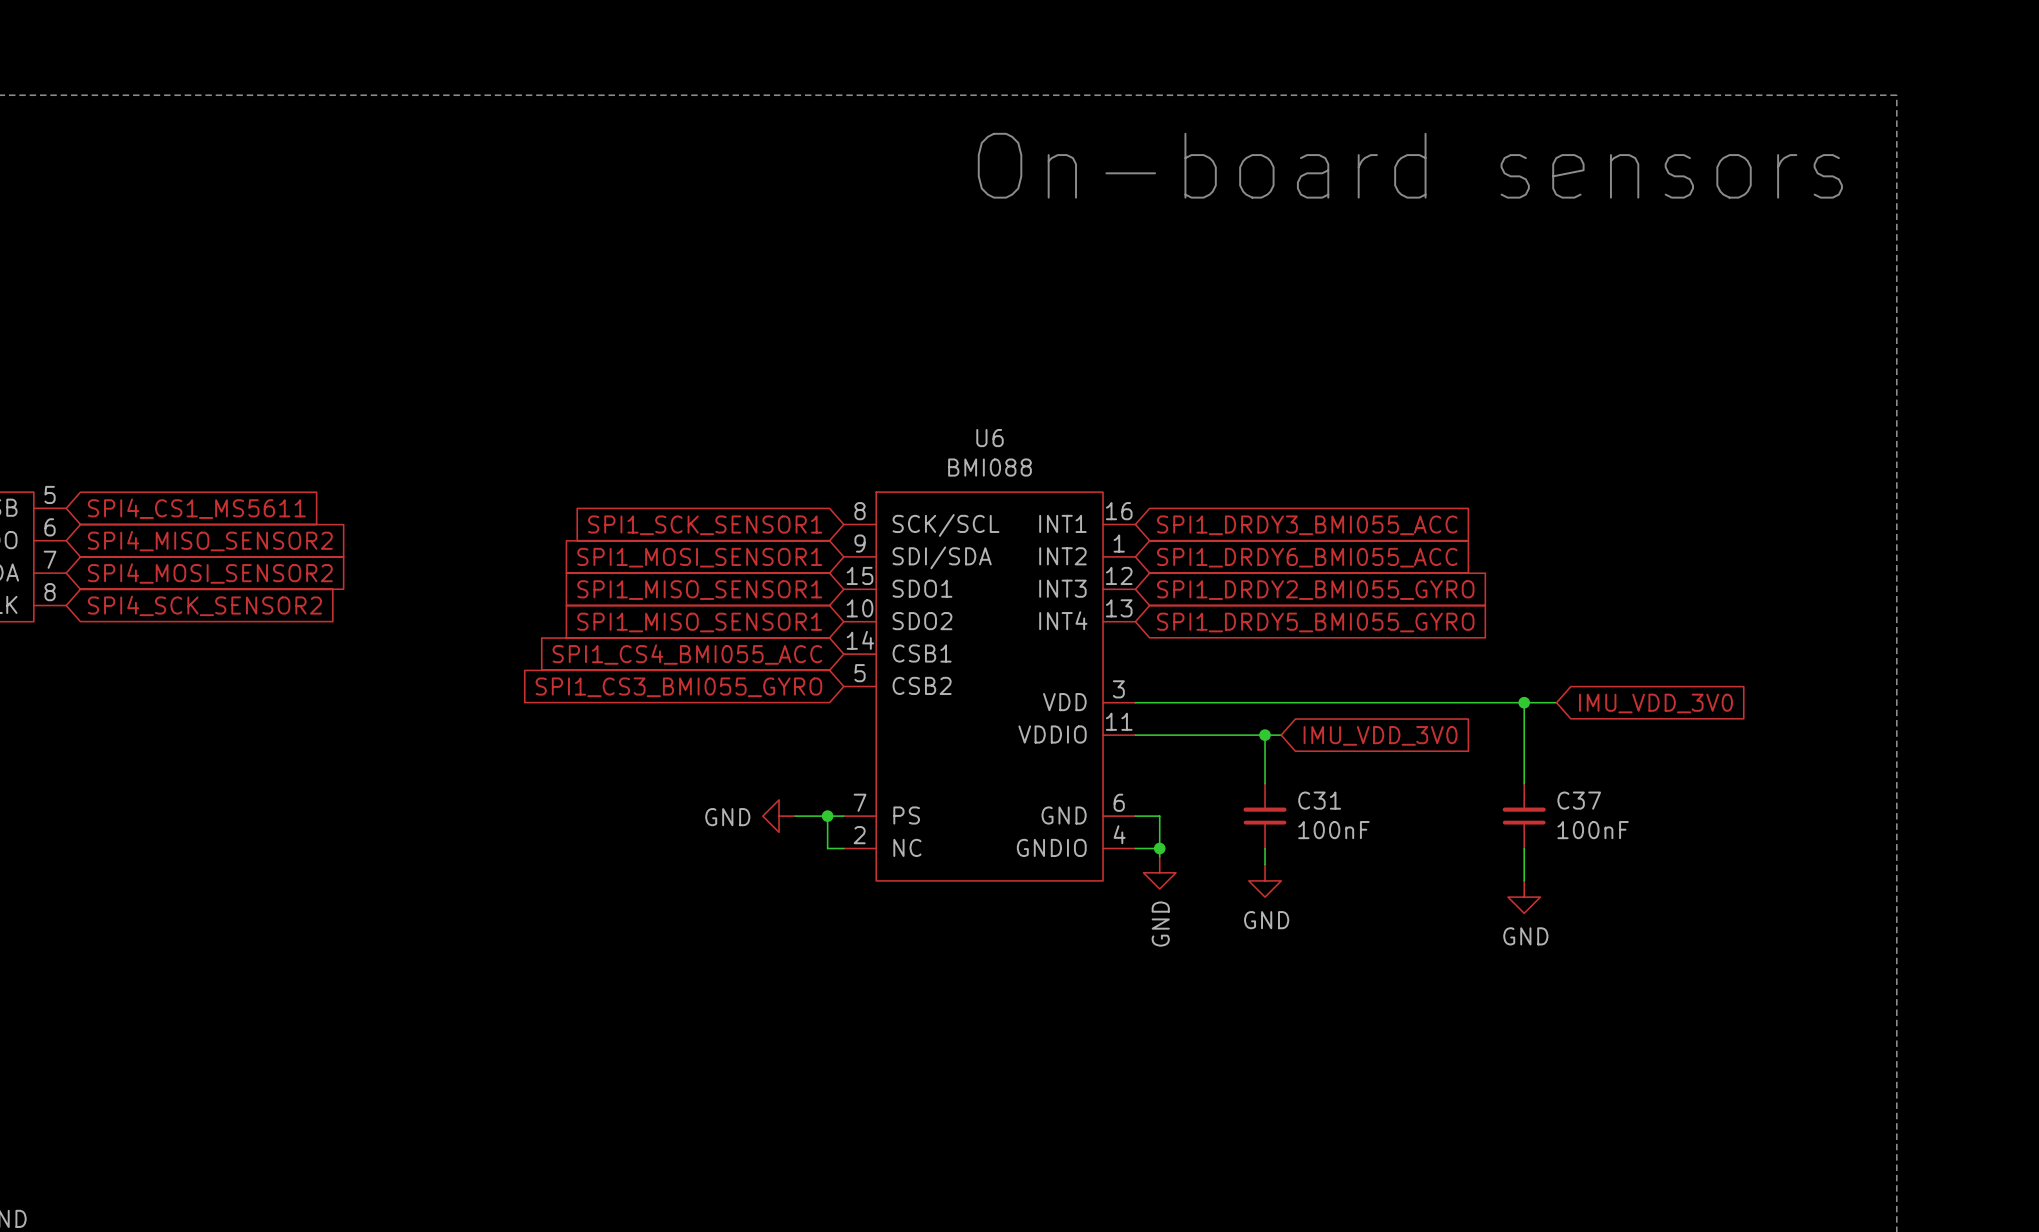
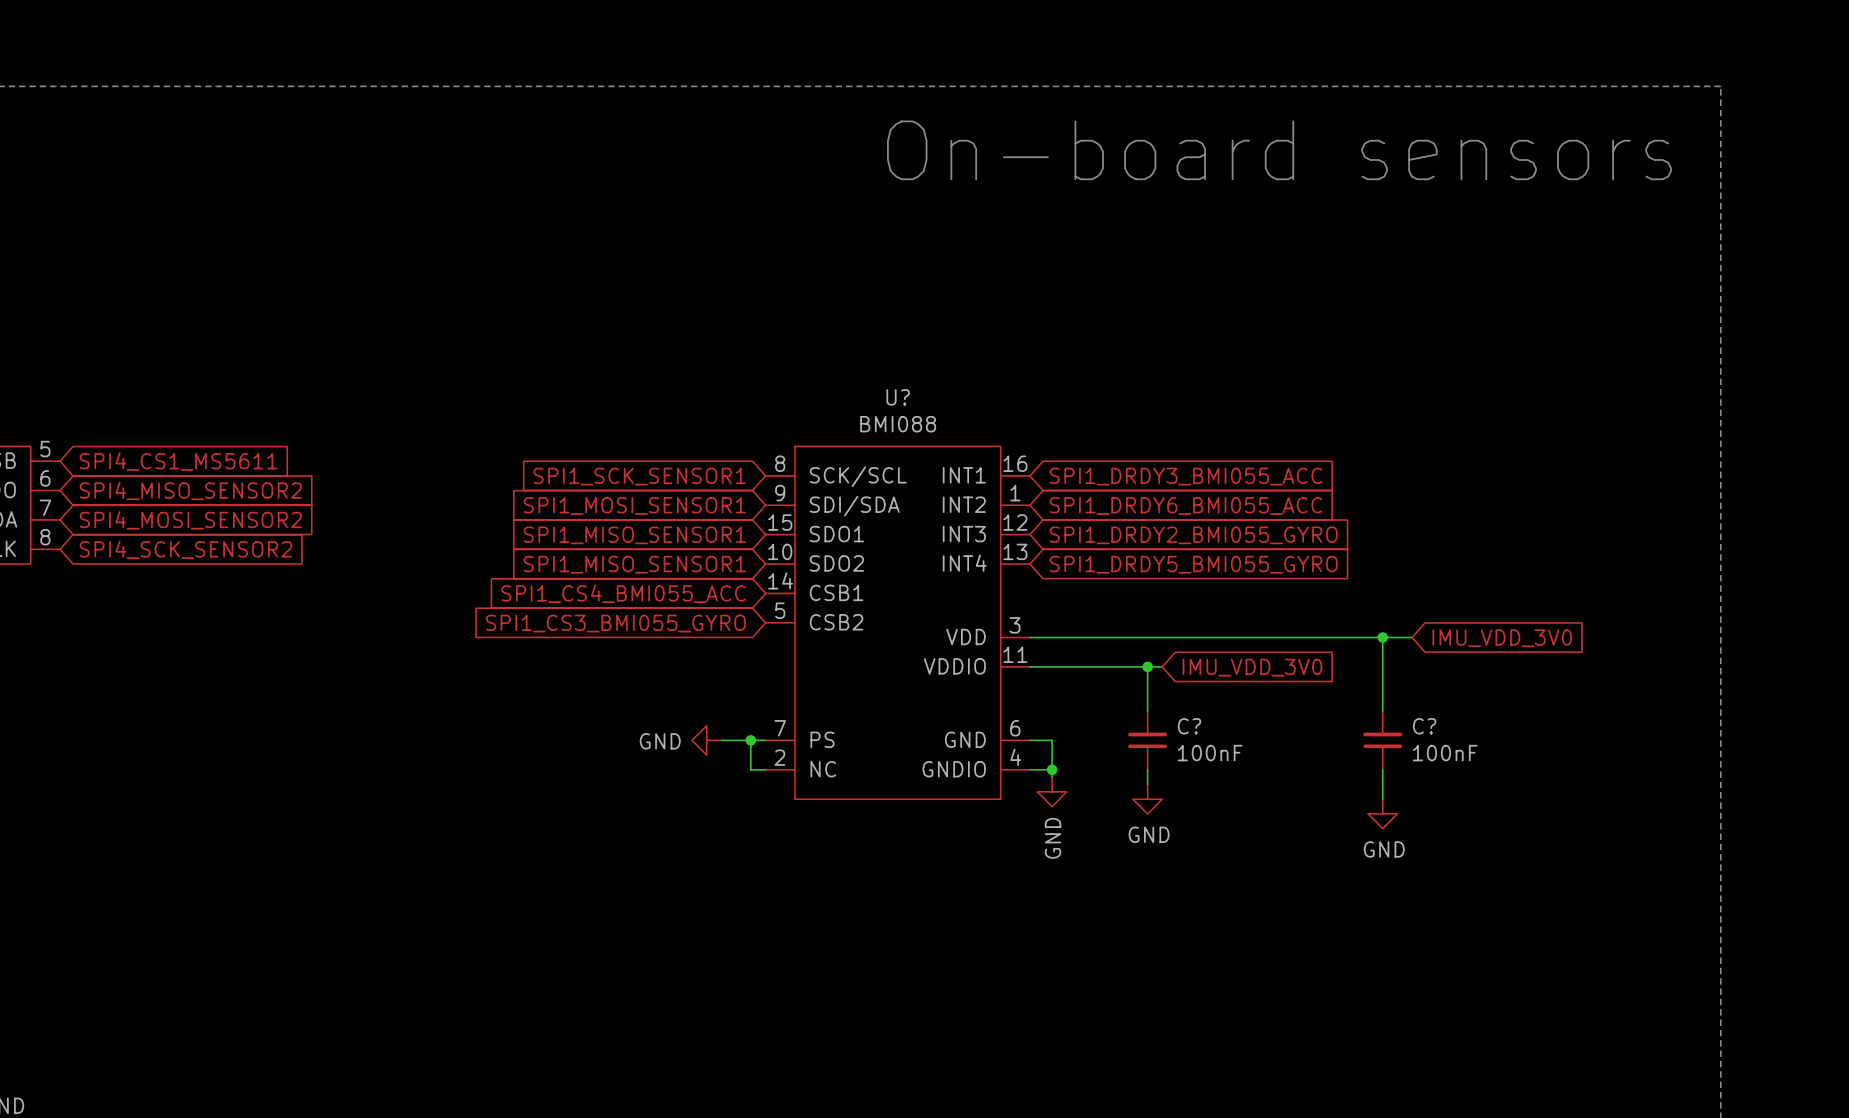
U6 name: U6 (990, 438) -> U? (898, 397)
C31 name: C31 (1319, 800) -> C? (1189, 726)
C37 name: C37 (1579, 800) -> C? (1424, 726)

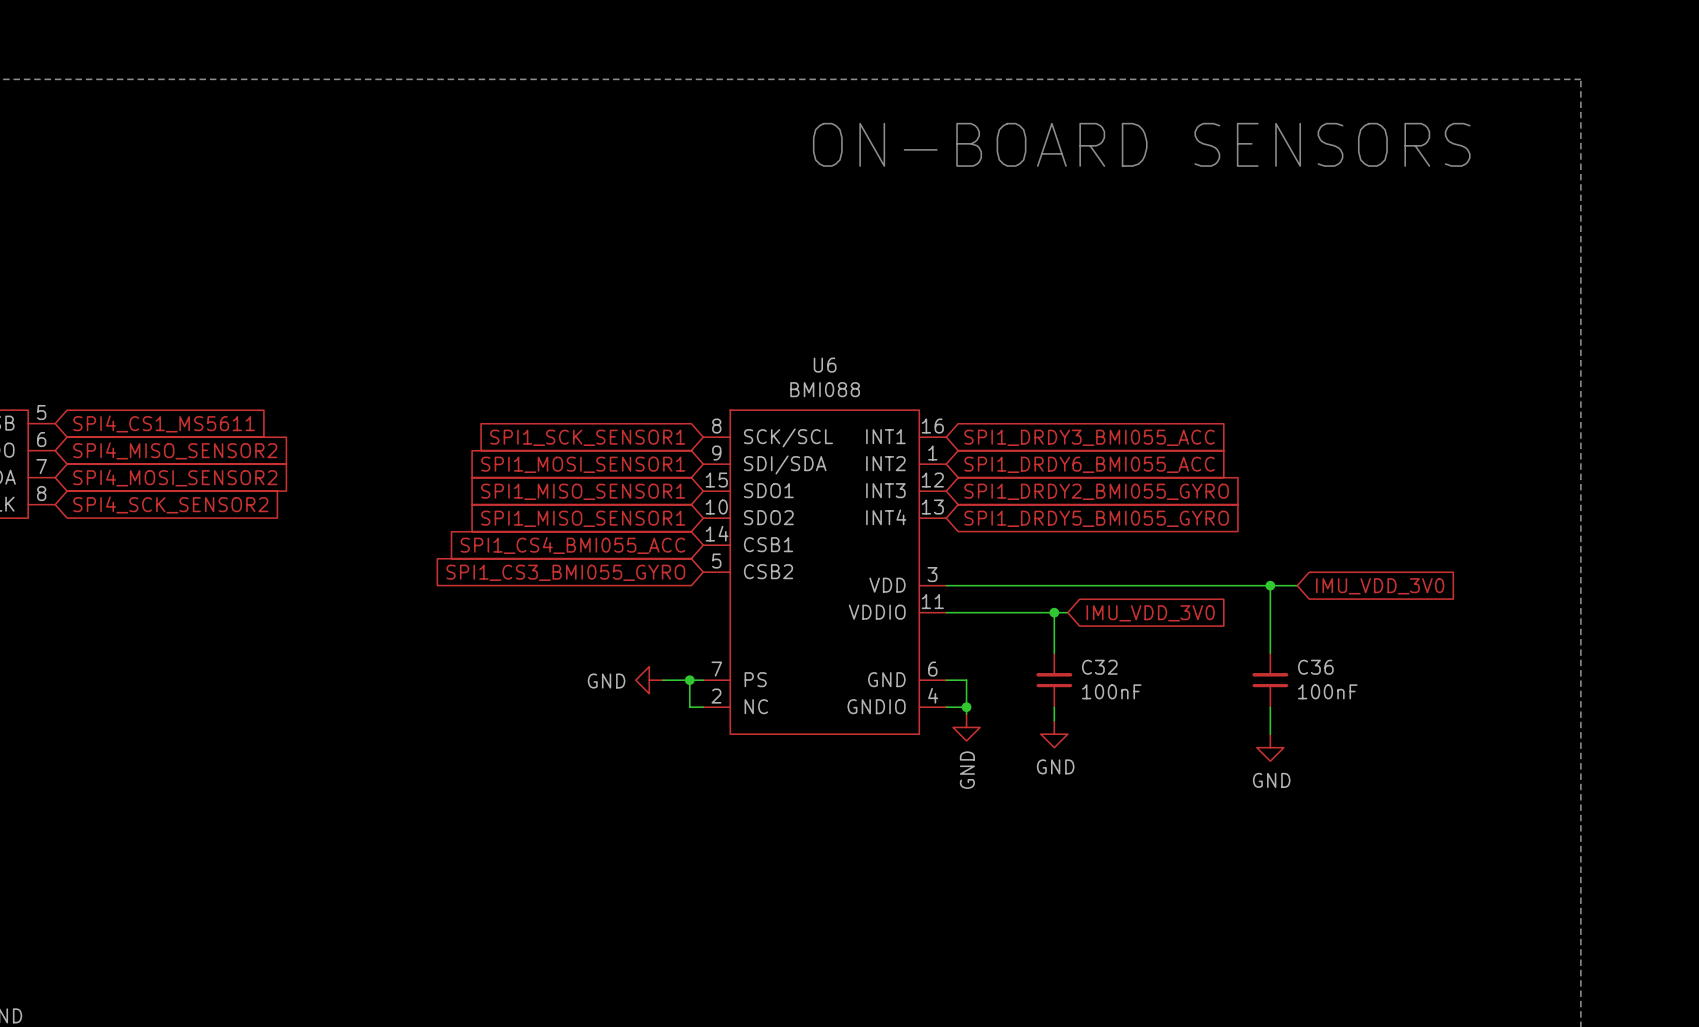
text: On-board sensors (1279, 150) -> ON-BOARD SENSORS (1141, 144)
U? name: U? (898, 397) -> U6 (825, 365)
C? name: C? (1189, 726) -> C32 (1099, 667)
C? name: C? (1424, 726) -> C36 (1315, 667)

